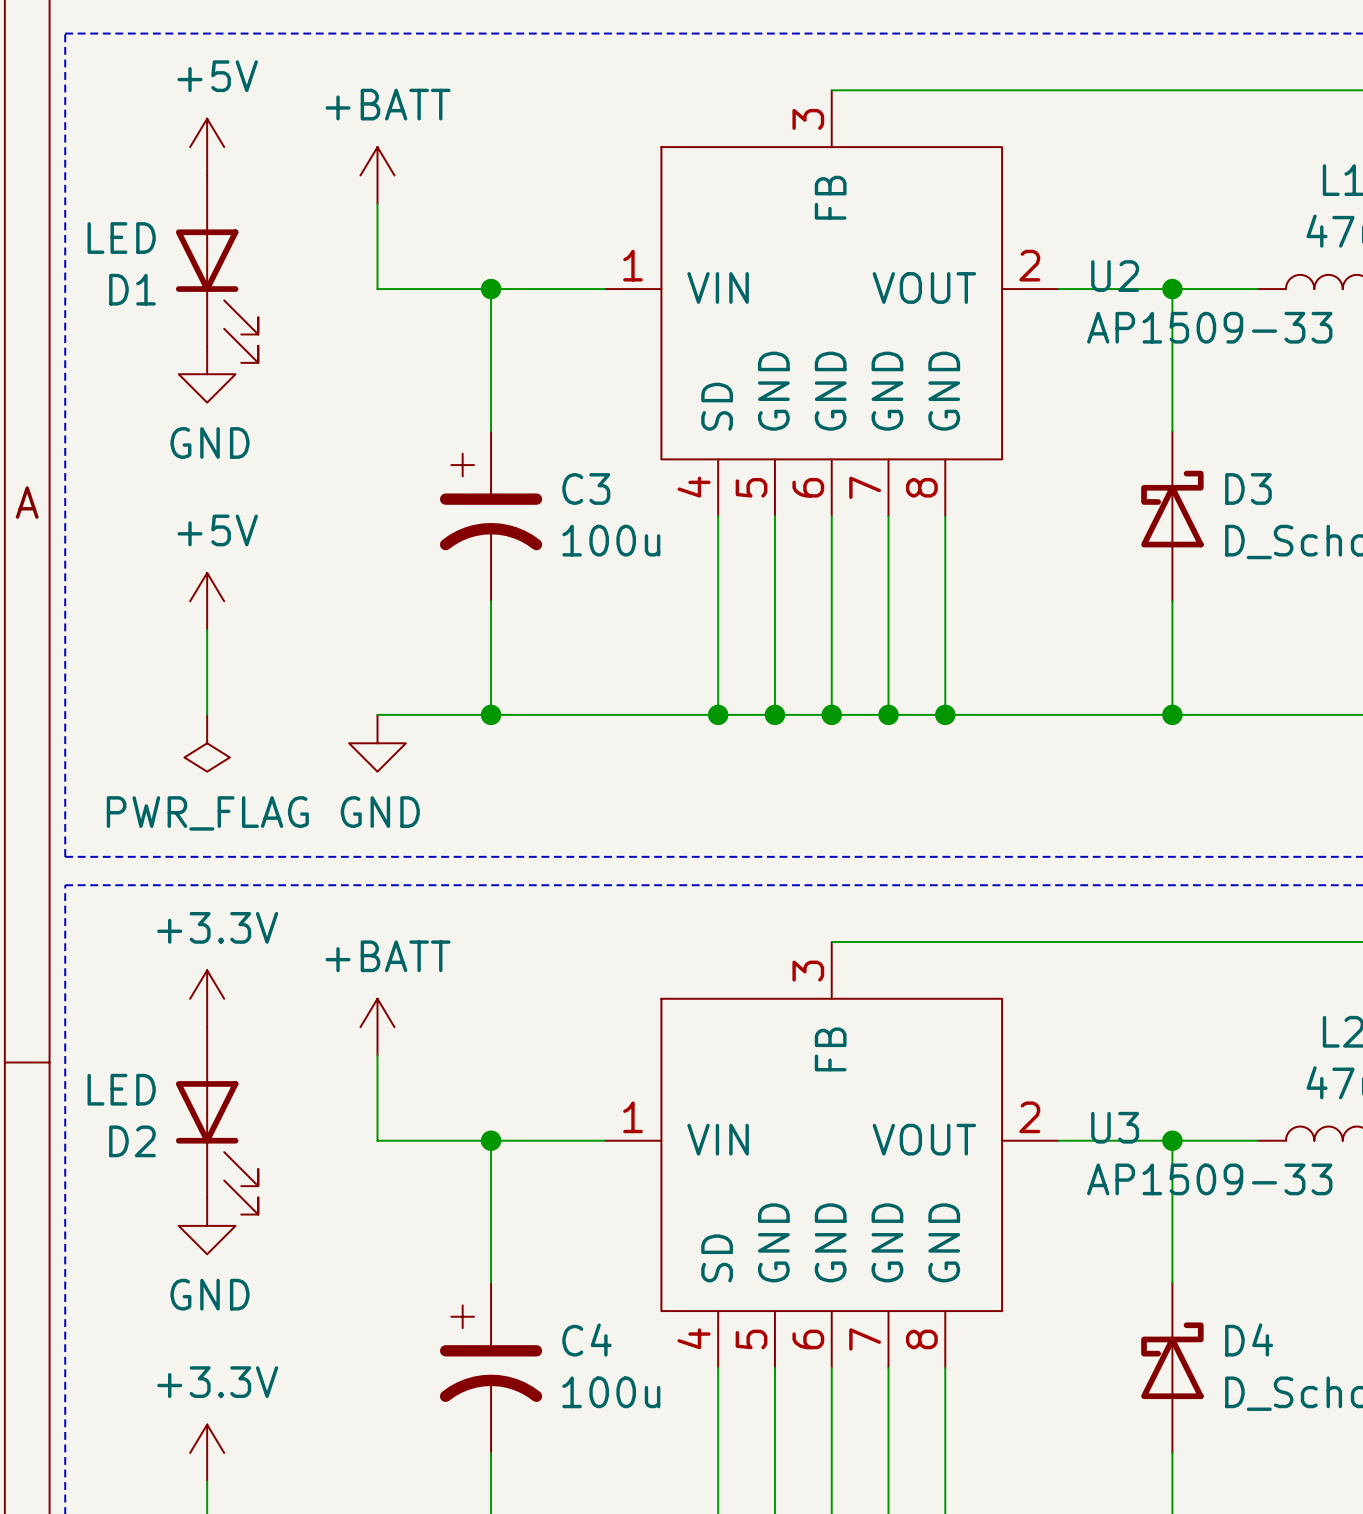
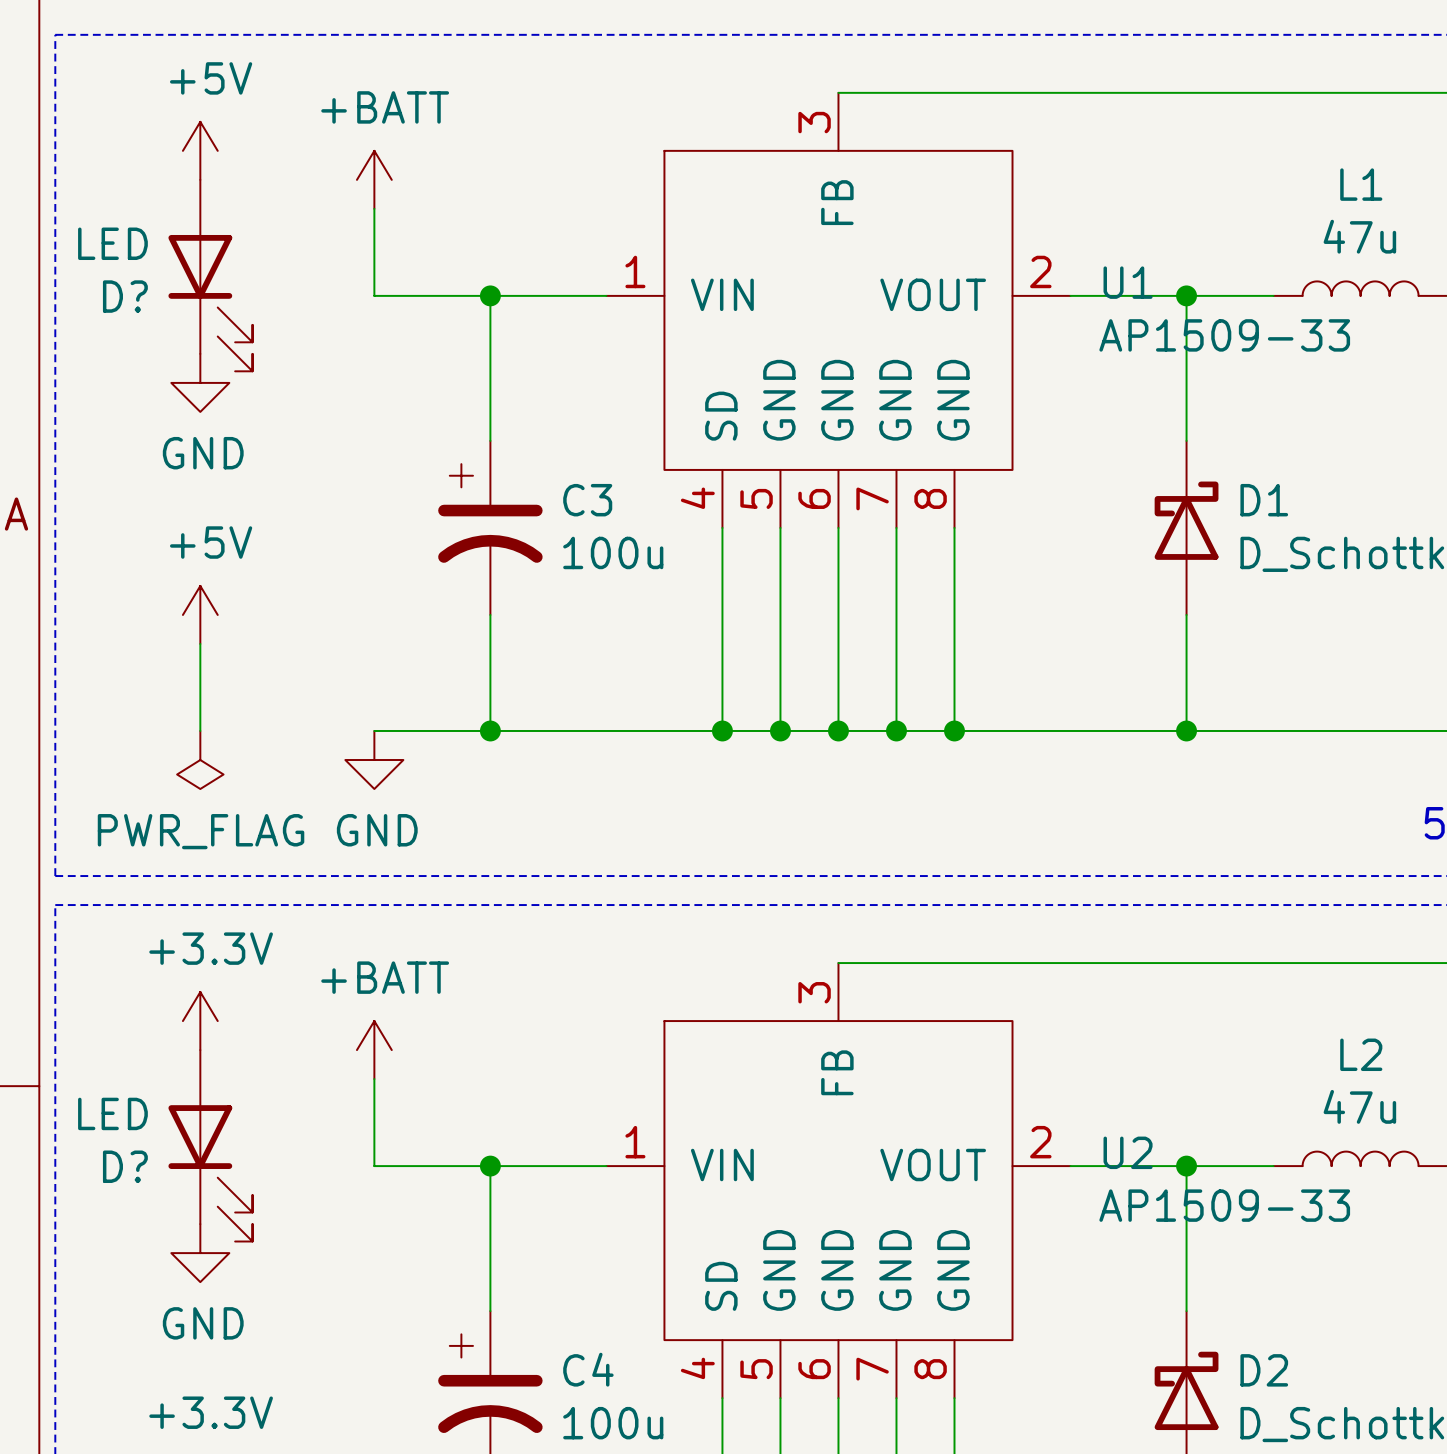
U2 name: U2 (1115, 276) -> U1 (1128, 282)
D1 name: D1 (132, 289) -> D? (125, 296)
D3 name: D3 (1248, 488) -> D1 (1264, 500)
U3 name: U3 (1115, 1127) -> U2 (1128, 1152)
D2 name: D2 (132, 1141) -> D? (125, 1166)
D4 name: D4 (1249, 1339) -> D2 (1264, 1370)

